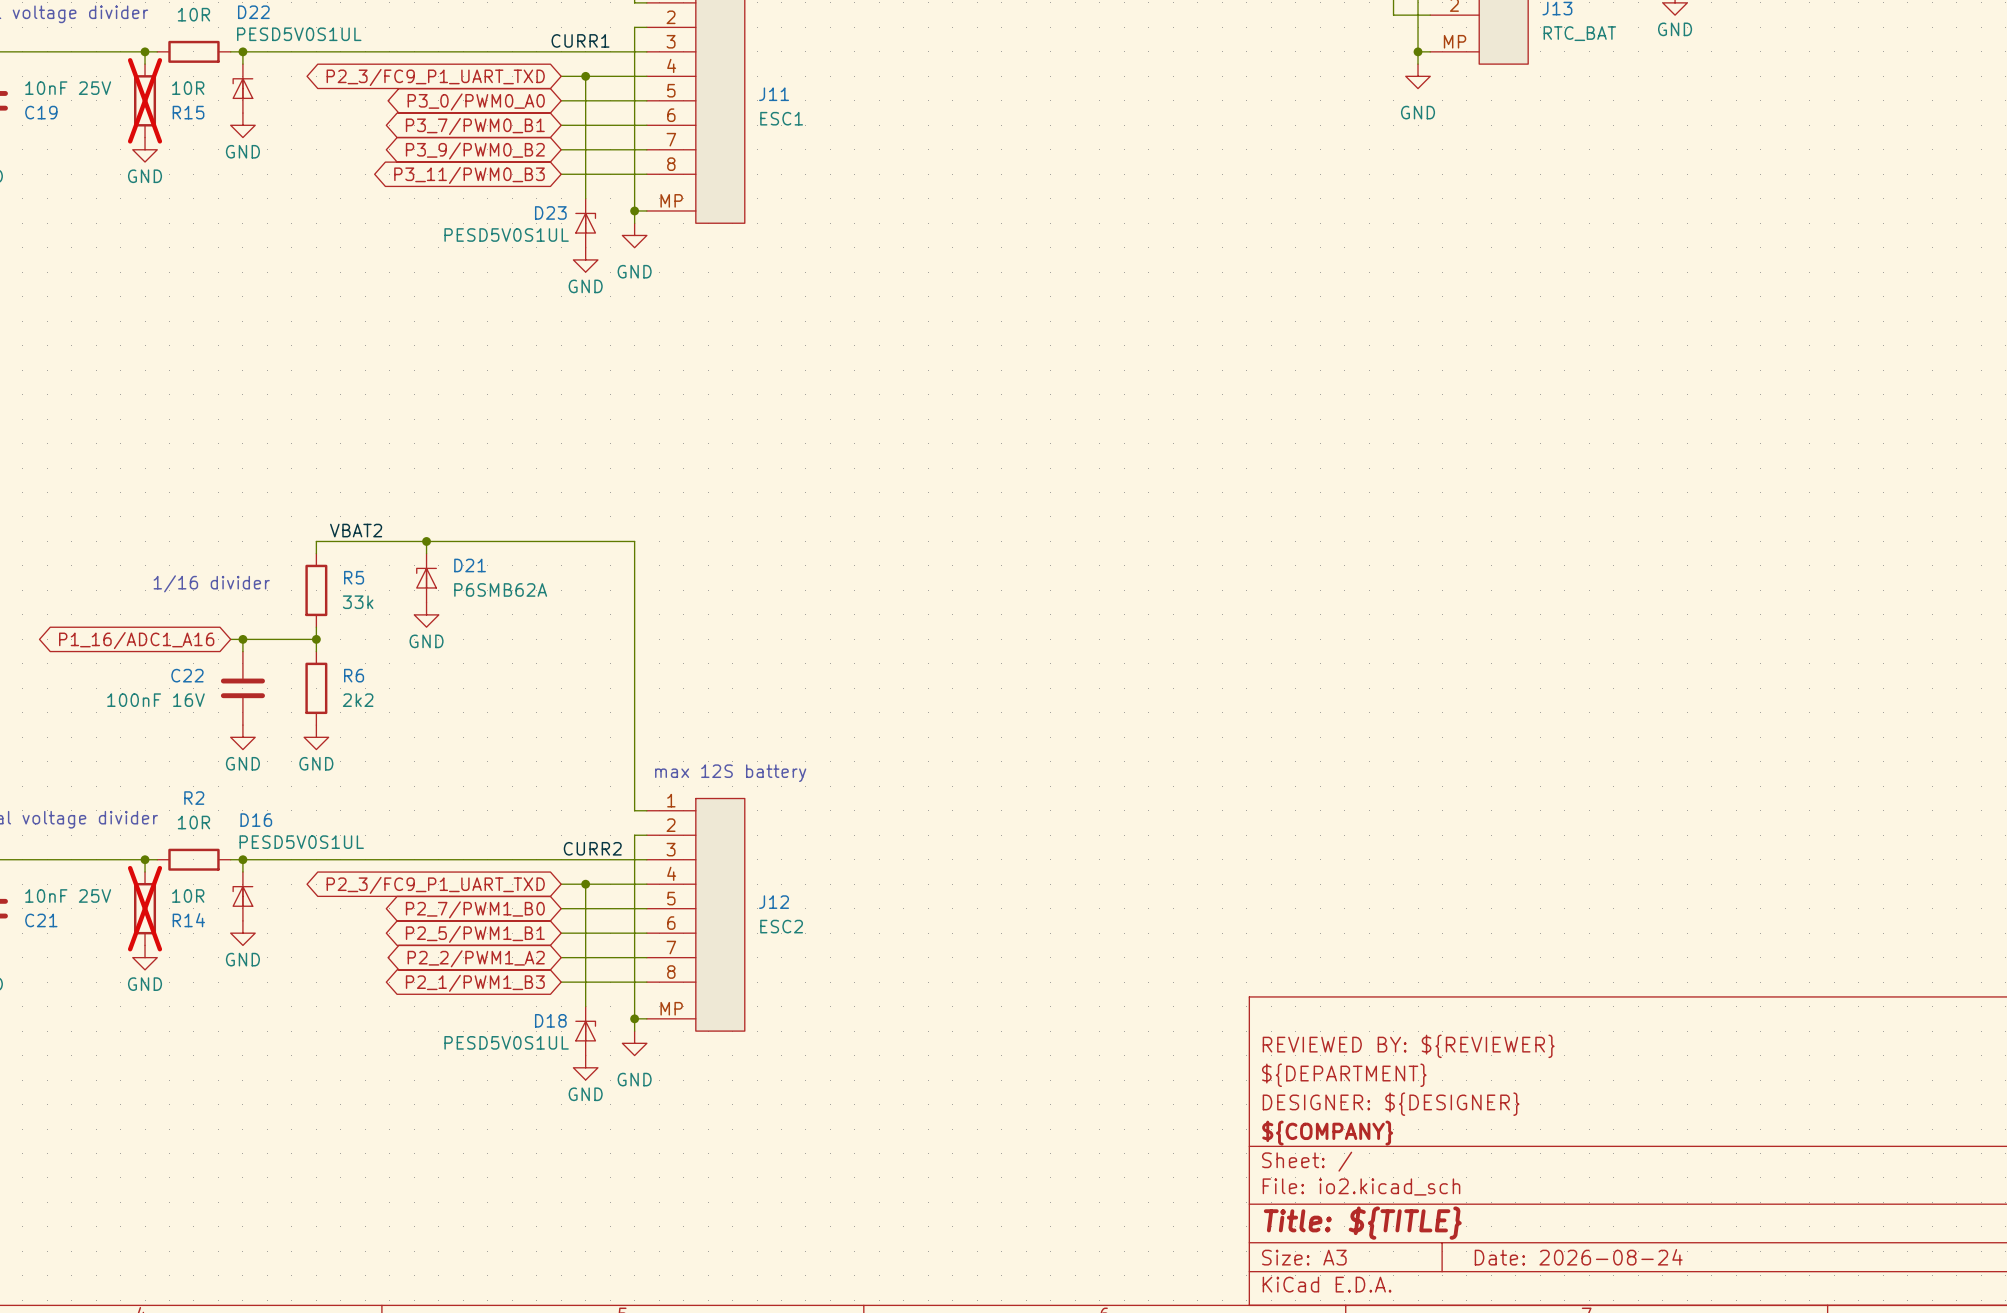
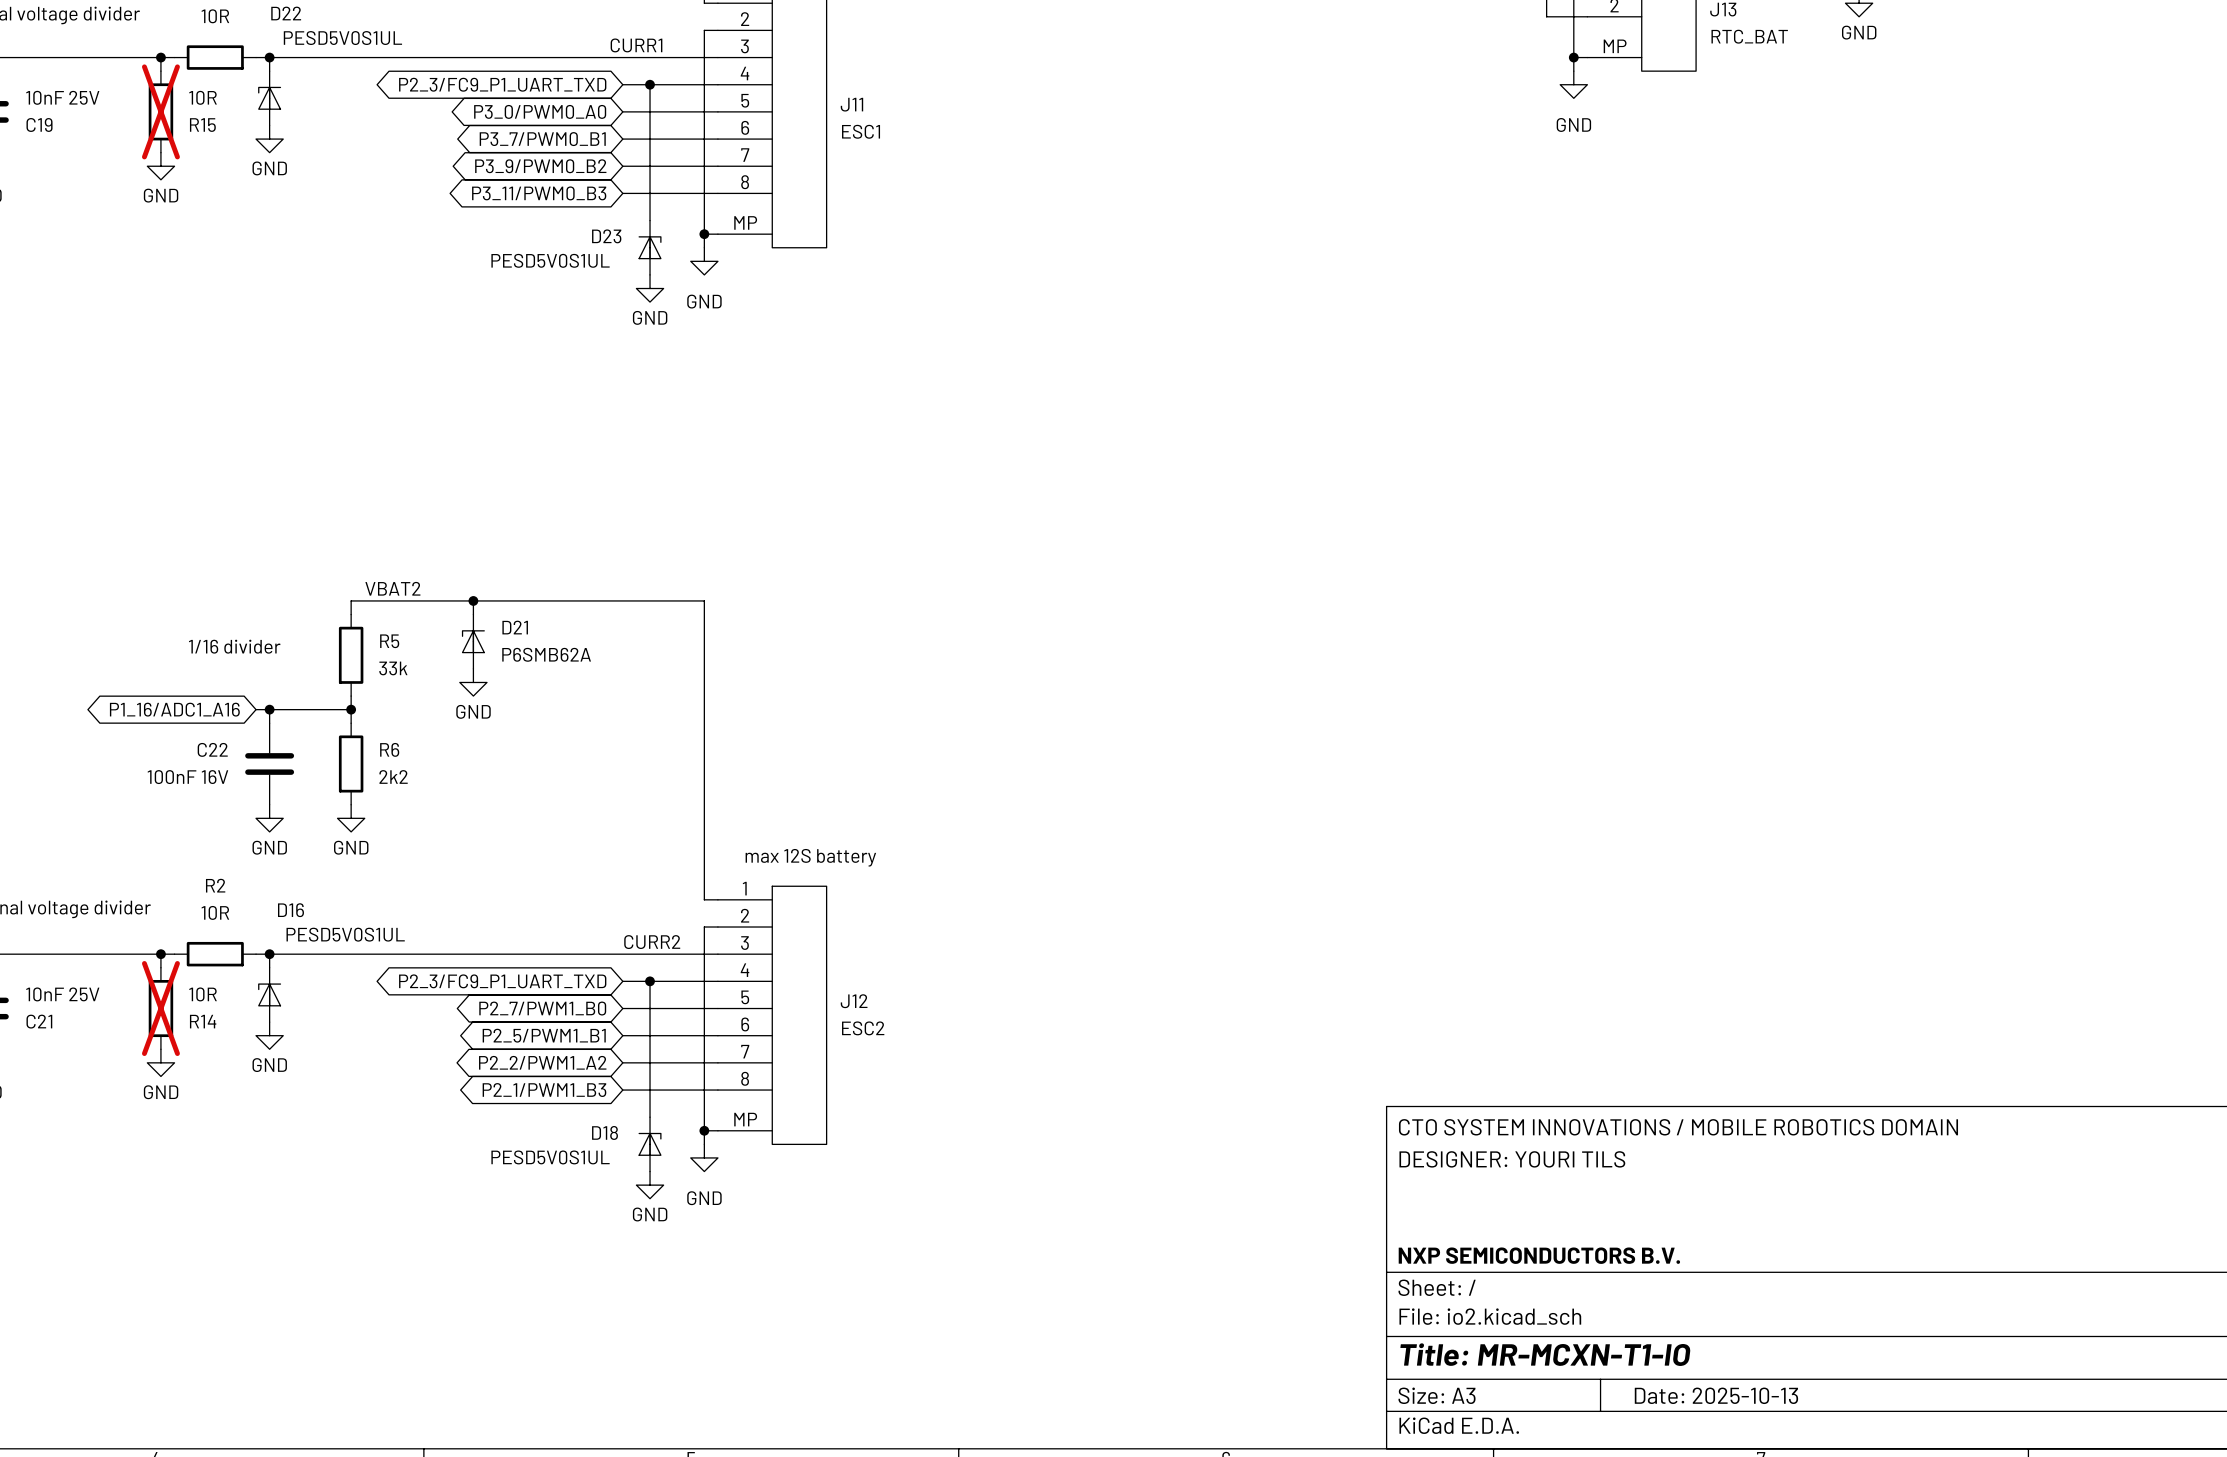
title block: none -> CTO SYSTEM INNOVATIONS / MOBILE ROBOTICS DOMAIN (1678, 1127)
title block: REVIEWED BY: ${REVIEWER} (1408, 1046) -> DESIGNER: YOURI TILS (1512, 1159)
title block: ${DEPARTMENT} (1344, 1075) -> none
title block: DESIGNER: ${DESIGNER} (1391, 1104) -> none
title block: ${COMPANY} (1327, 1133) -> NXP SEMICONDUCTORS B.V. (1539, 1255)
title block: Title: ${TITLE} (1362, 1223) -> Title: MR-MCXN-T1-IO (1545, 1354)
title block: Date: 2026-08-24 (1578, 1257) -> Date: 2025-10-13 (1716, 1395)

